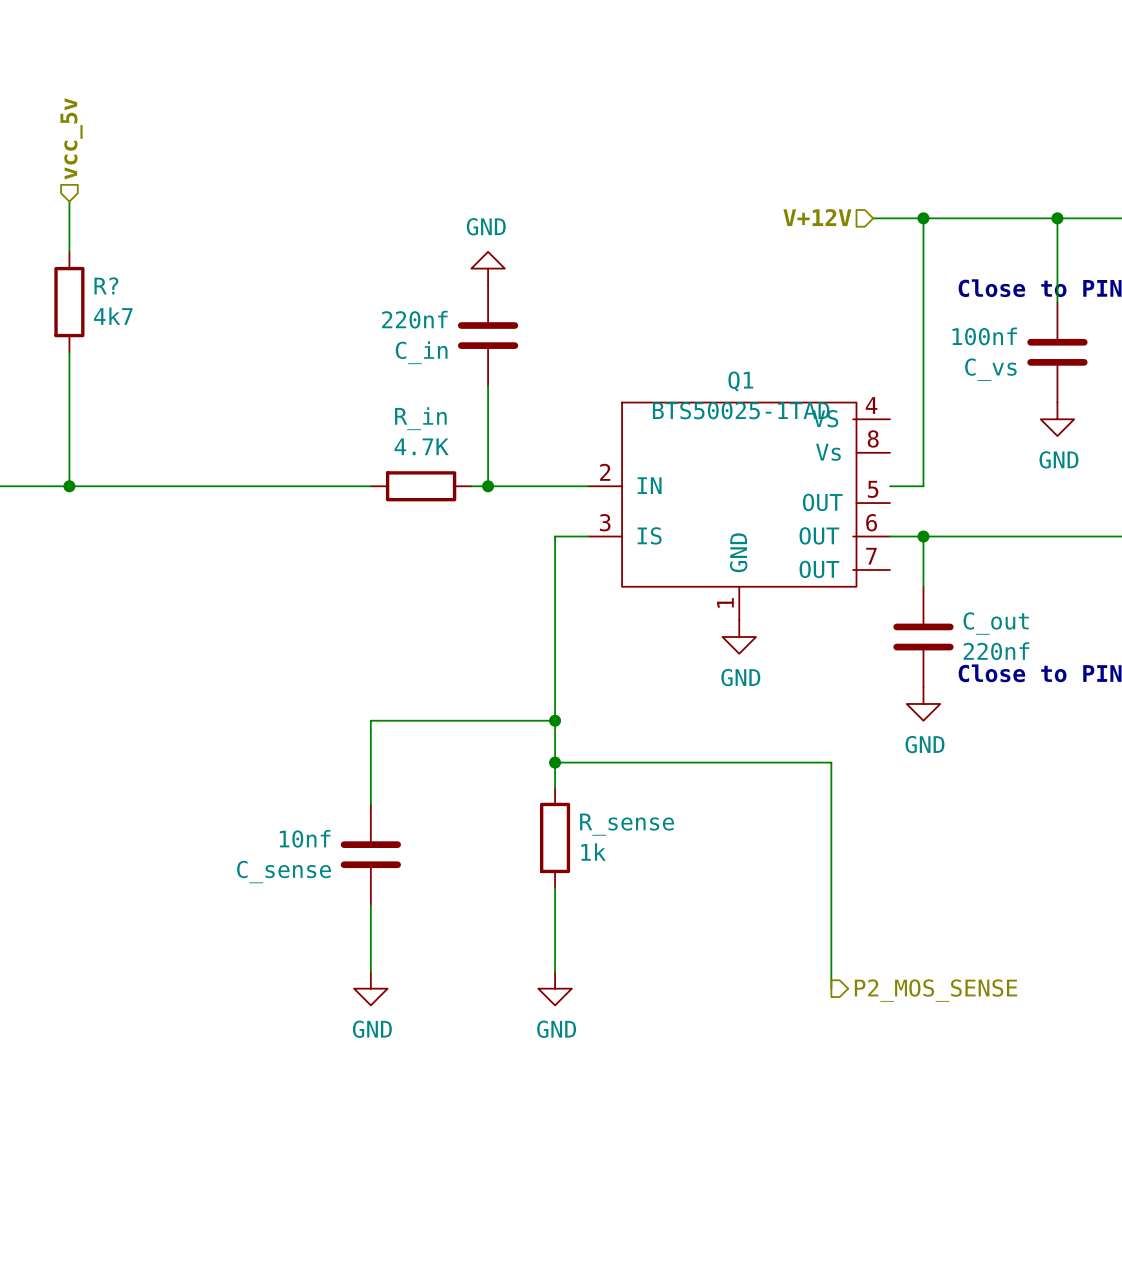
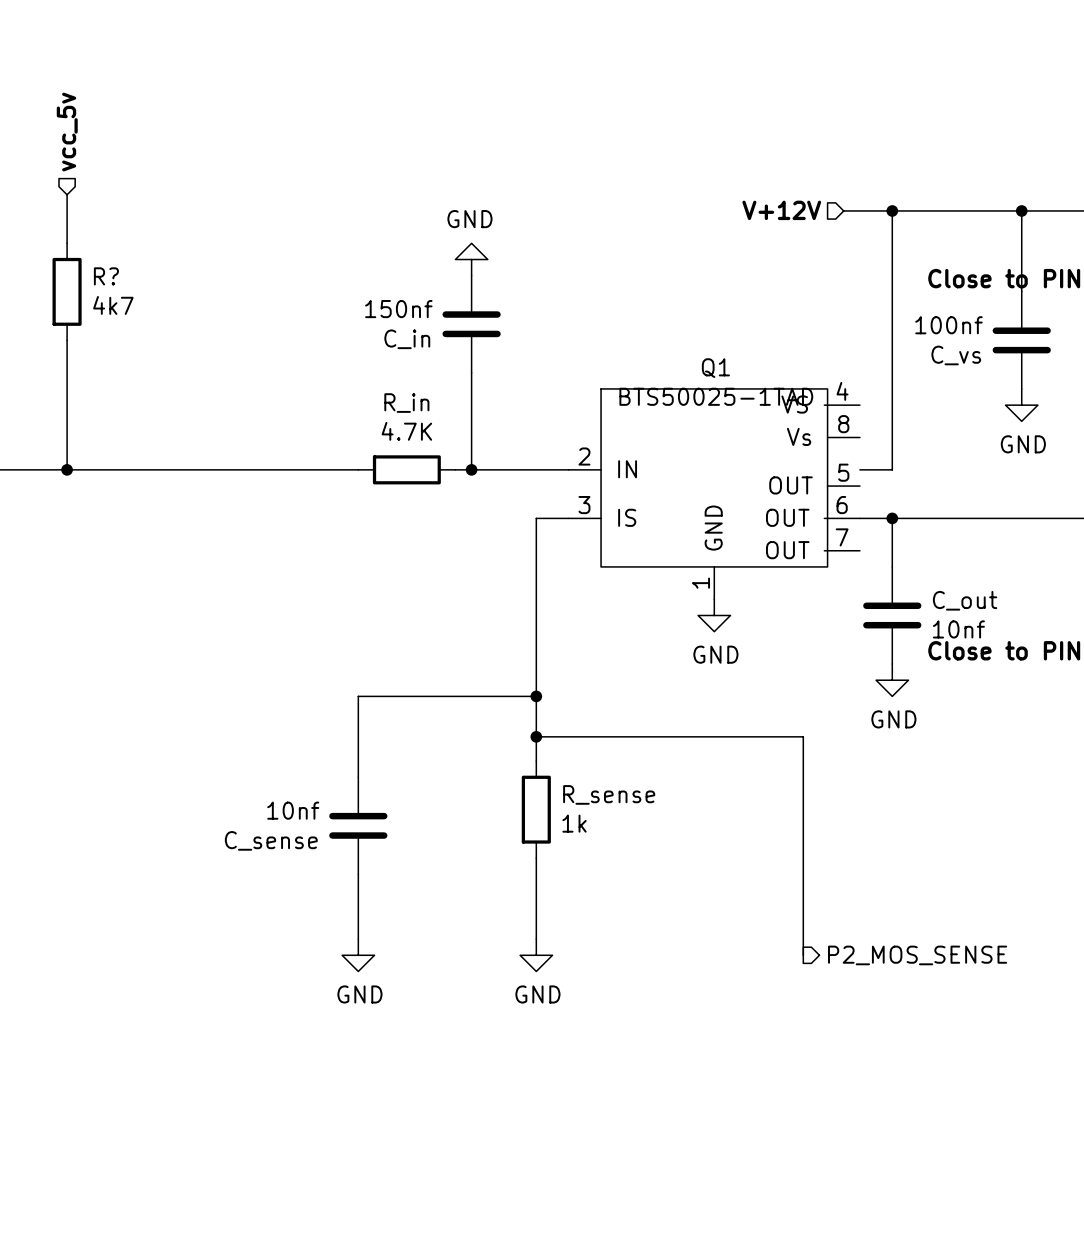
C_in value: 220nf (414, 319) -> 150nf (398, 309)
C_out value: 220nf (996, 651) -> 10nf (958, 629)

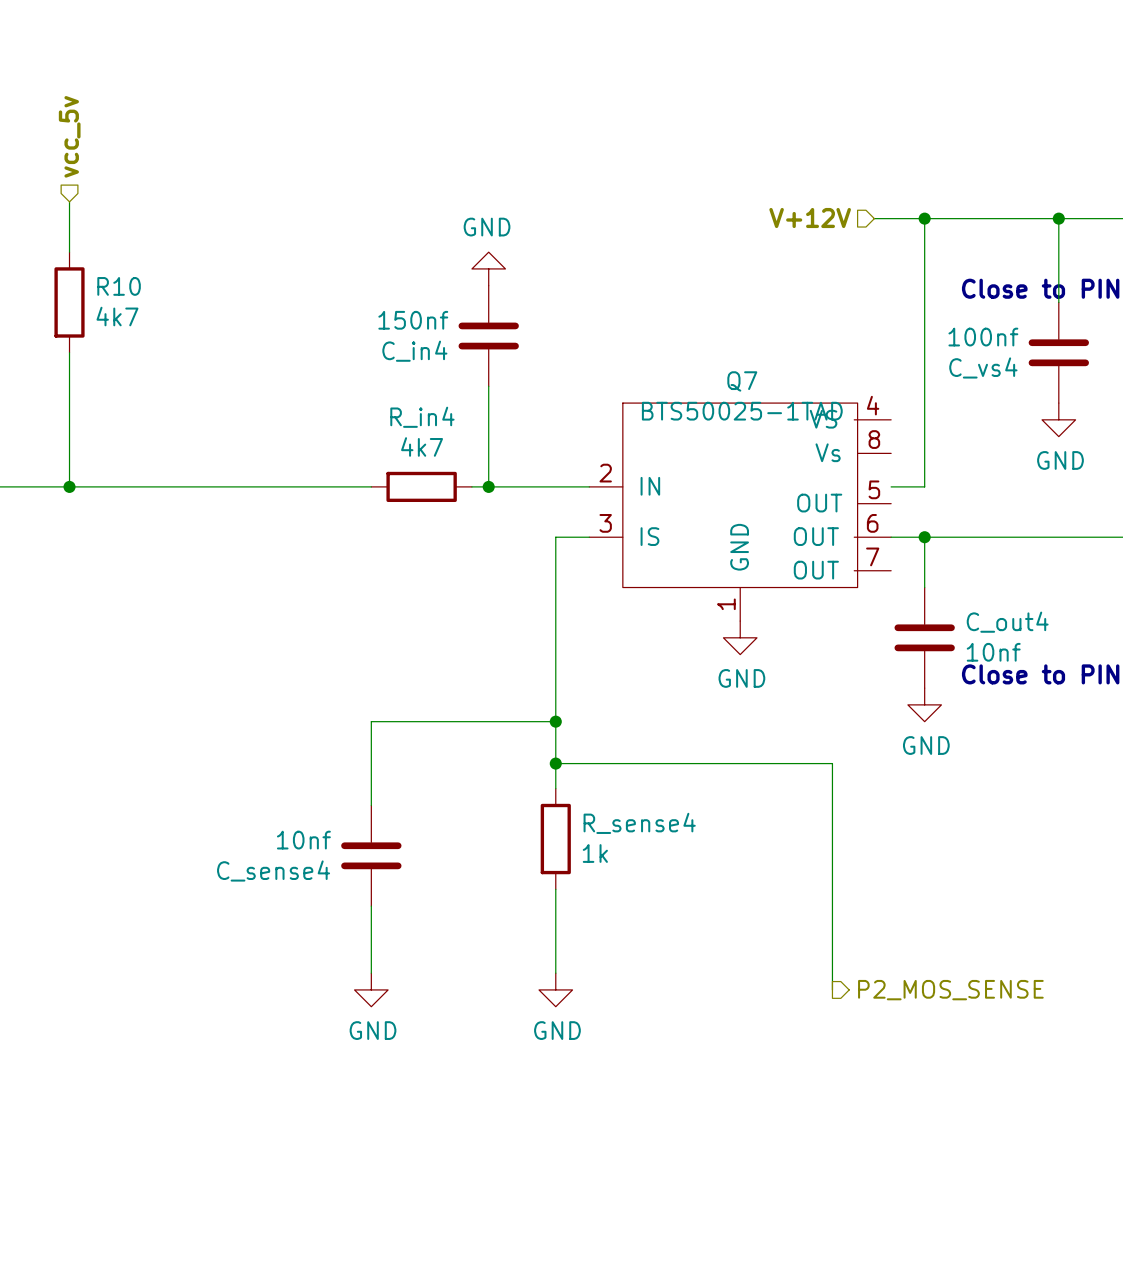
R? name: R? (106, 276) -> R10 (119, 286)
C_in name: C_in (407, 339) -> C_in4 (414, 351)
C_vs name: C_vs (956, 355) -> C_vs4 (983, 367)
Q1 name: Q1 (715, 368) -> Q7 (742, 381)
R_in name: R_in (406, 403) -> R_in4 (422, 417)
R_in value: 4.7K (406, 431) -> 4k7 (422, 446)
C_out name: C_out (965, 600) -> C_out4 (1007, 622)
R_sense name: R_sense (609, 794) -> R_sense4 (639, 823)
C_sense name: C_sense (271, 840) -> C_sense4 (273, 871)

